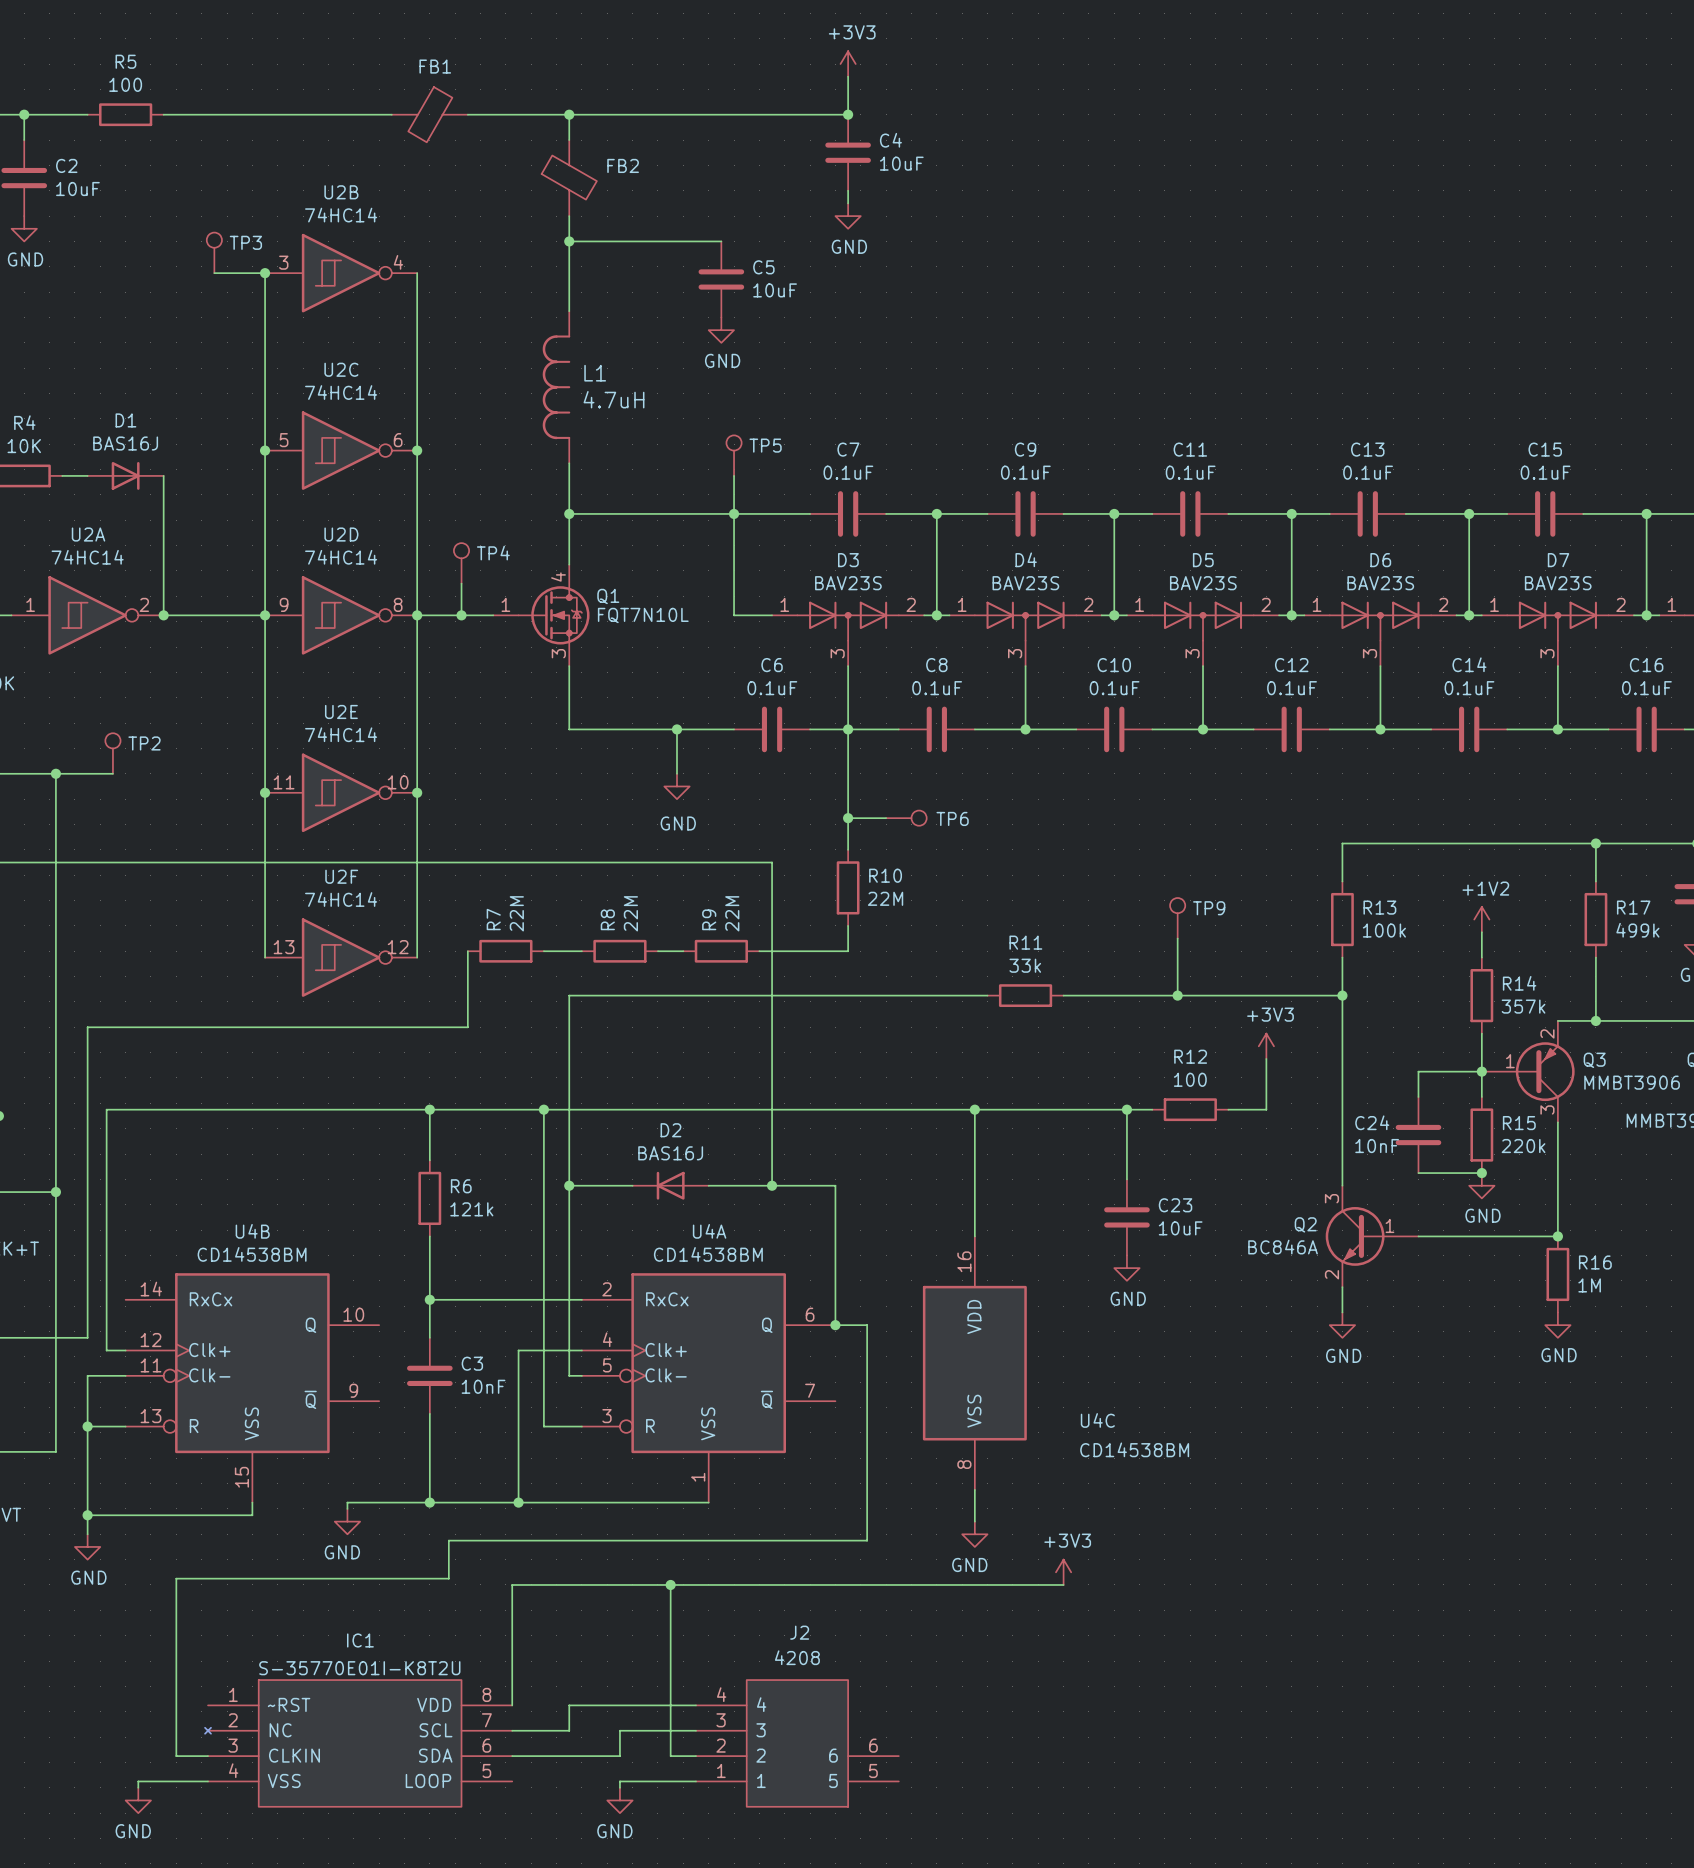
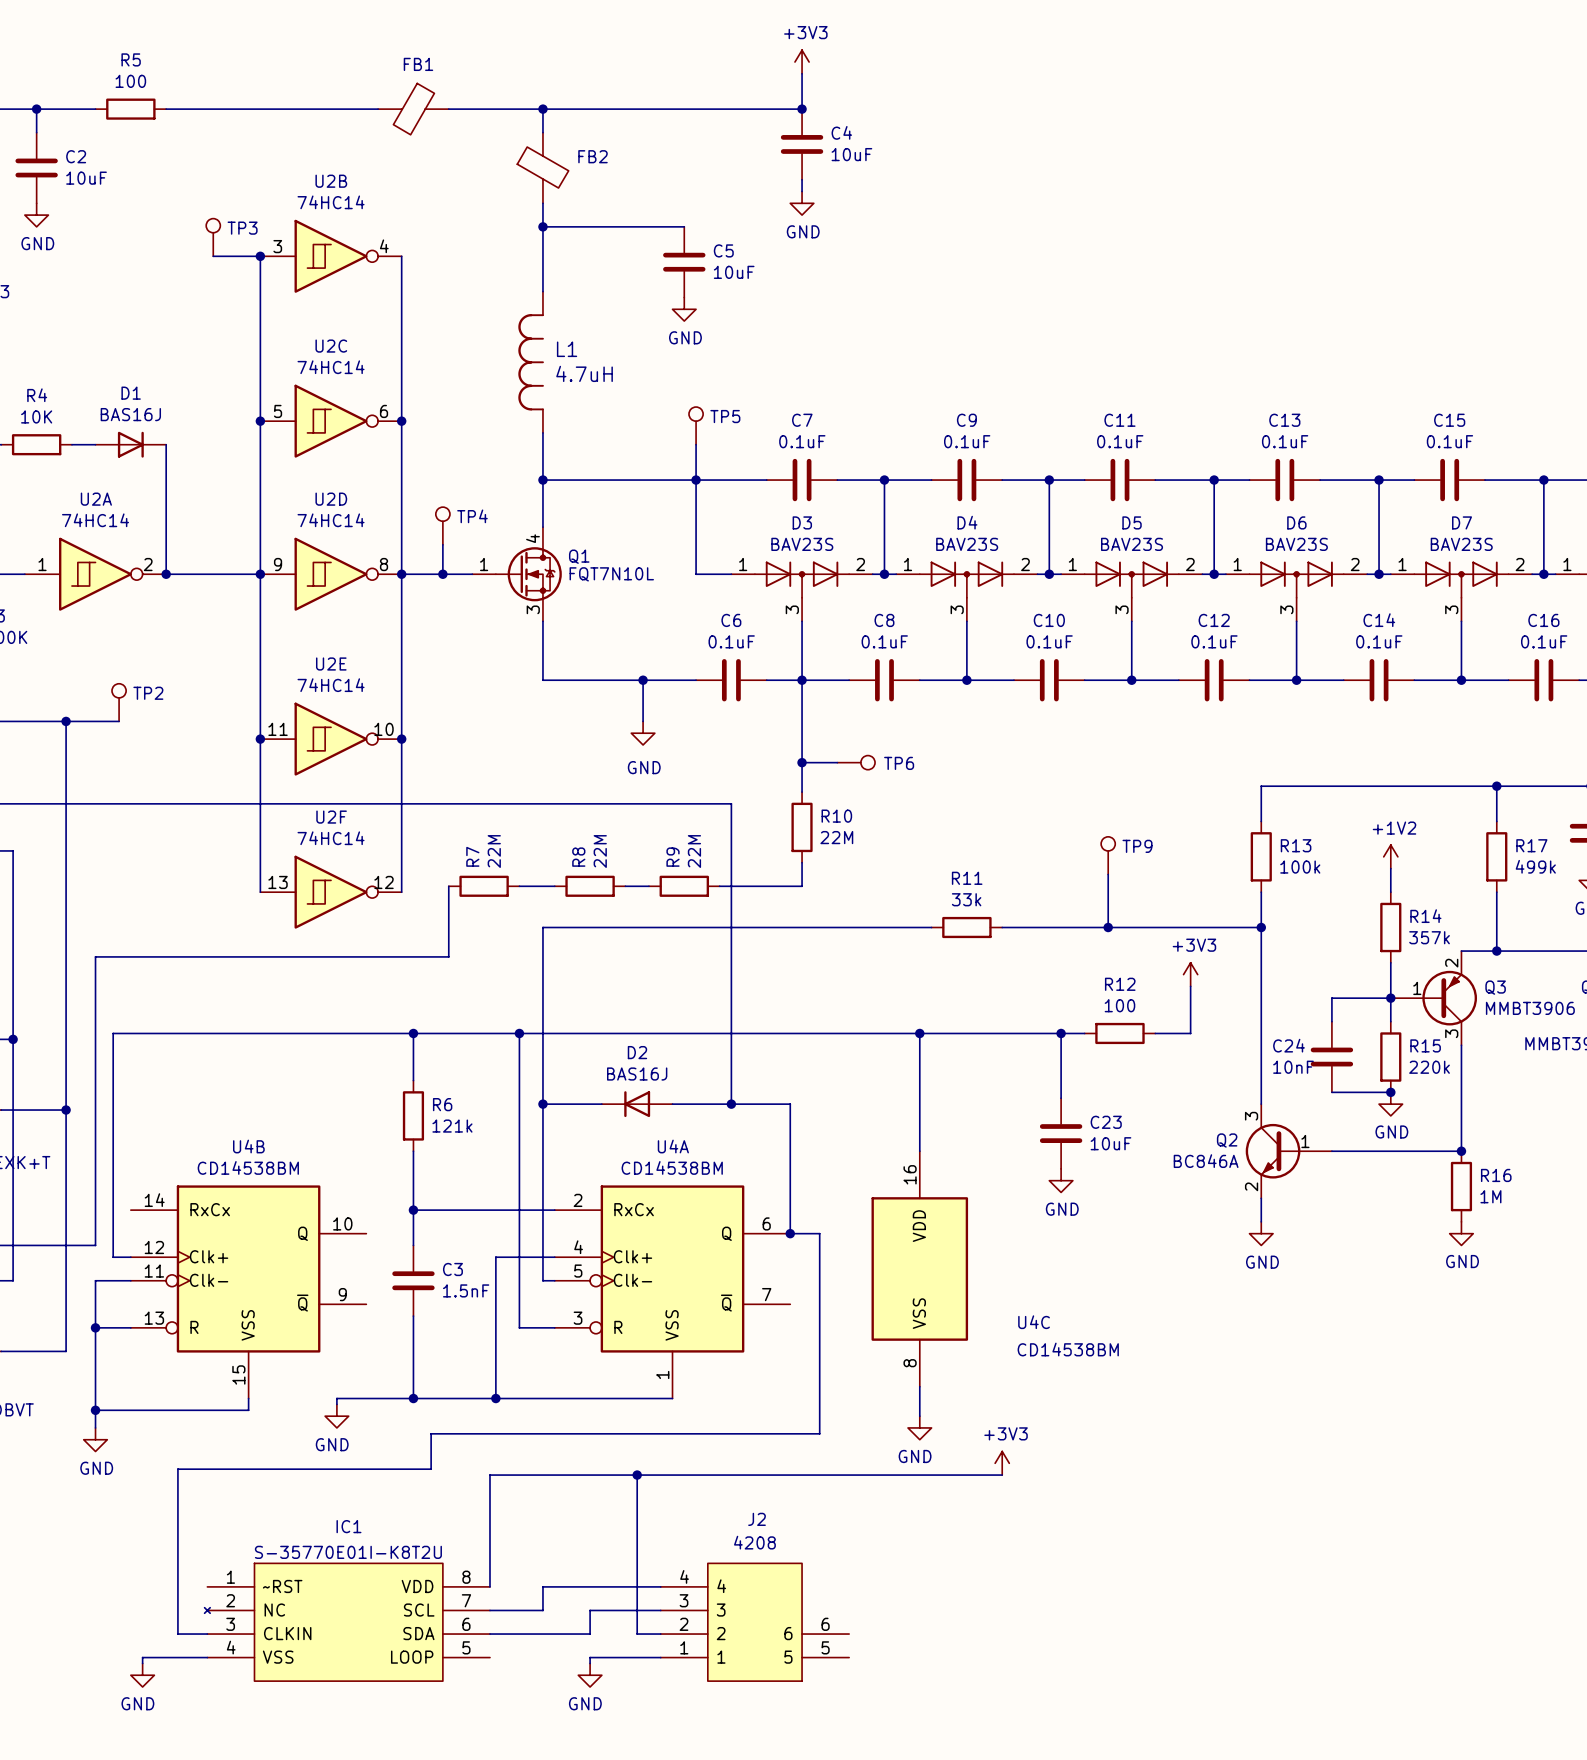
C3 value: 10nF (483, 1386) -> 1.5nF (466, 1290)

